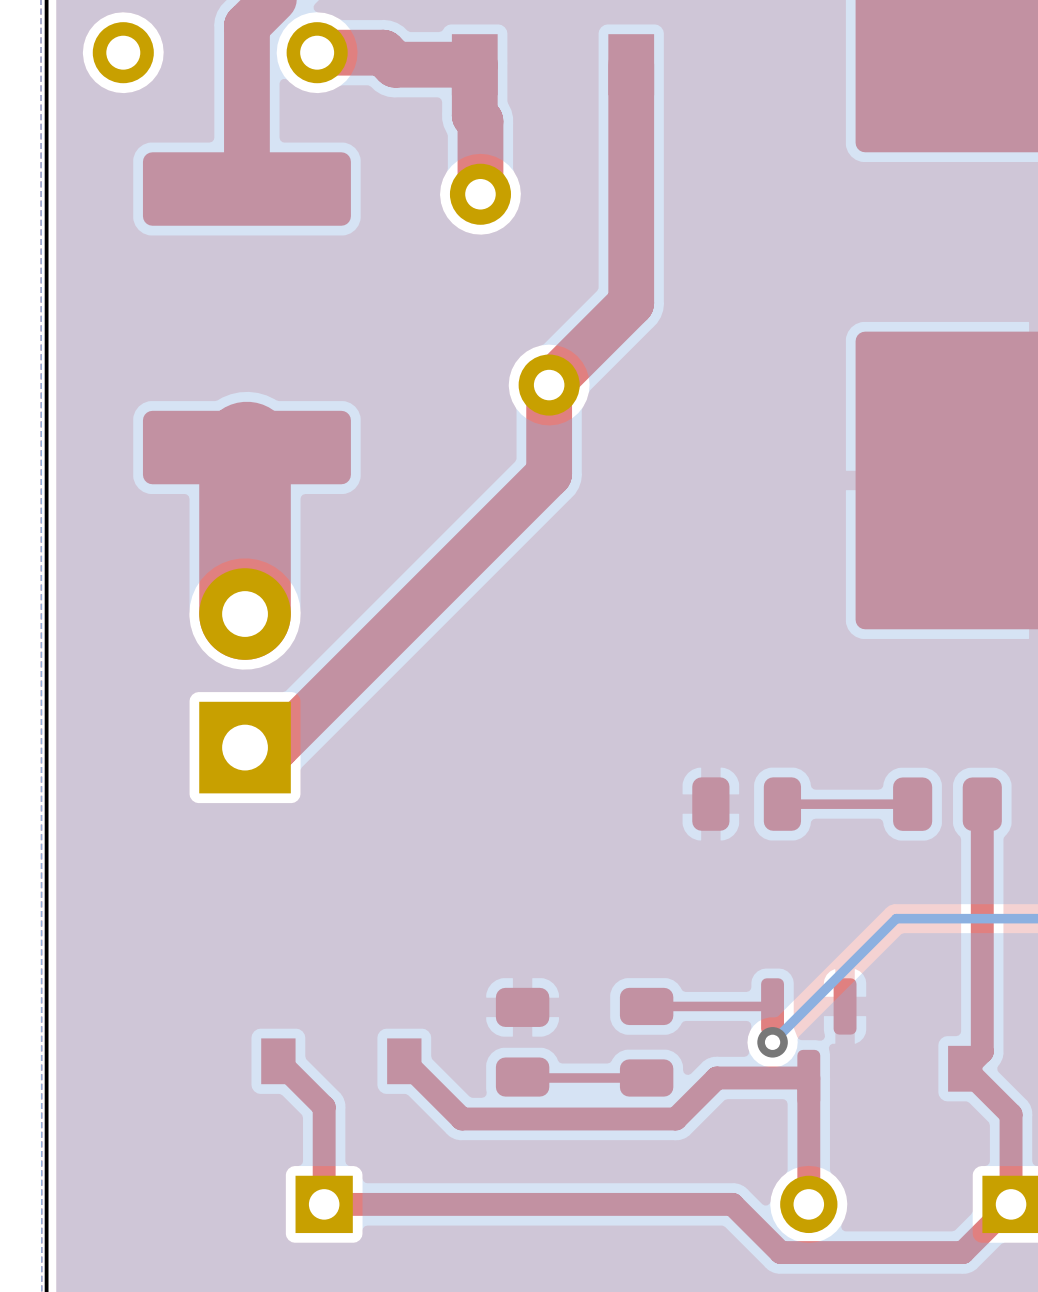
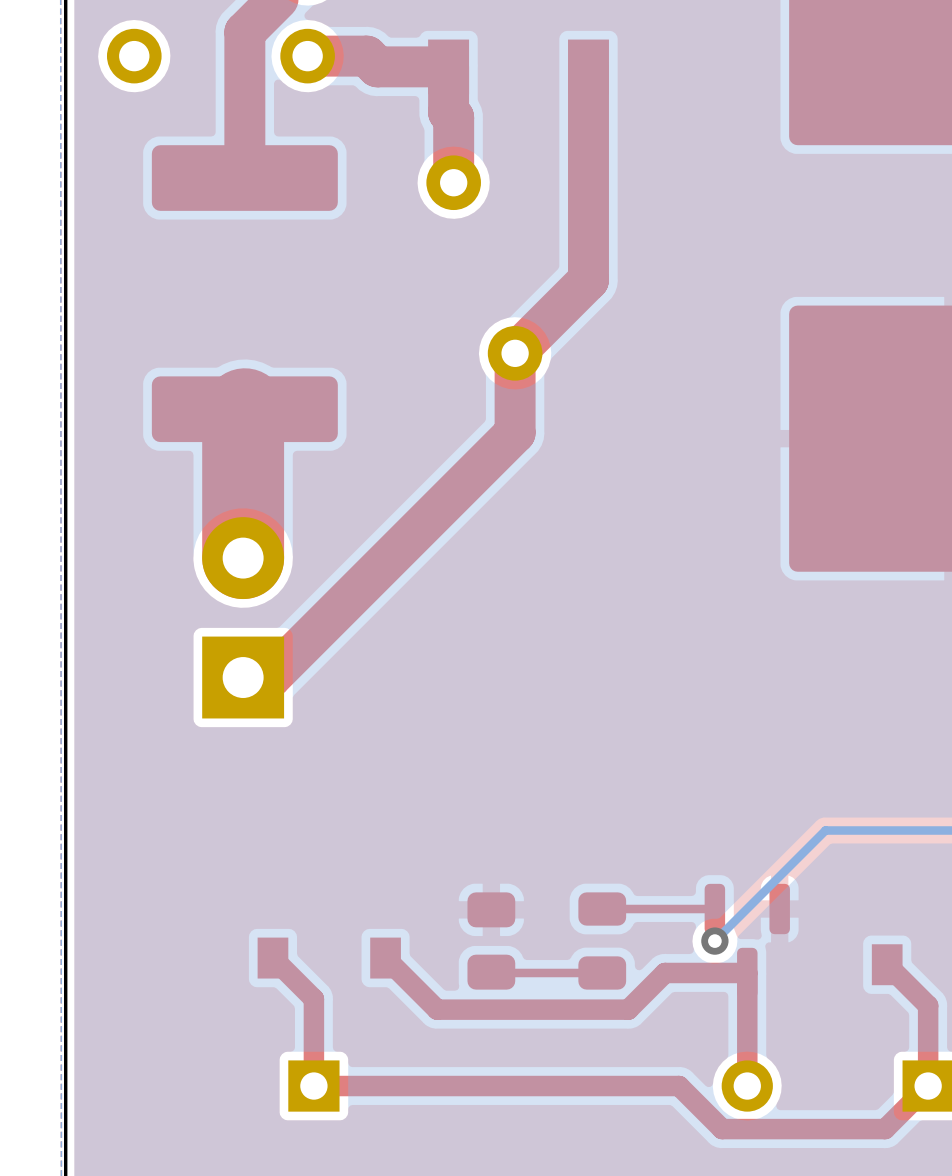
part: (746, 804) -> none
top track: (912, 804) (782, 804) -> none
part: (947, 804) -> none
top track: (982, 804) (982, 1051) (965, 1068) -> none

